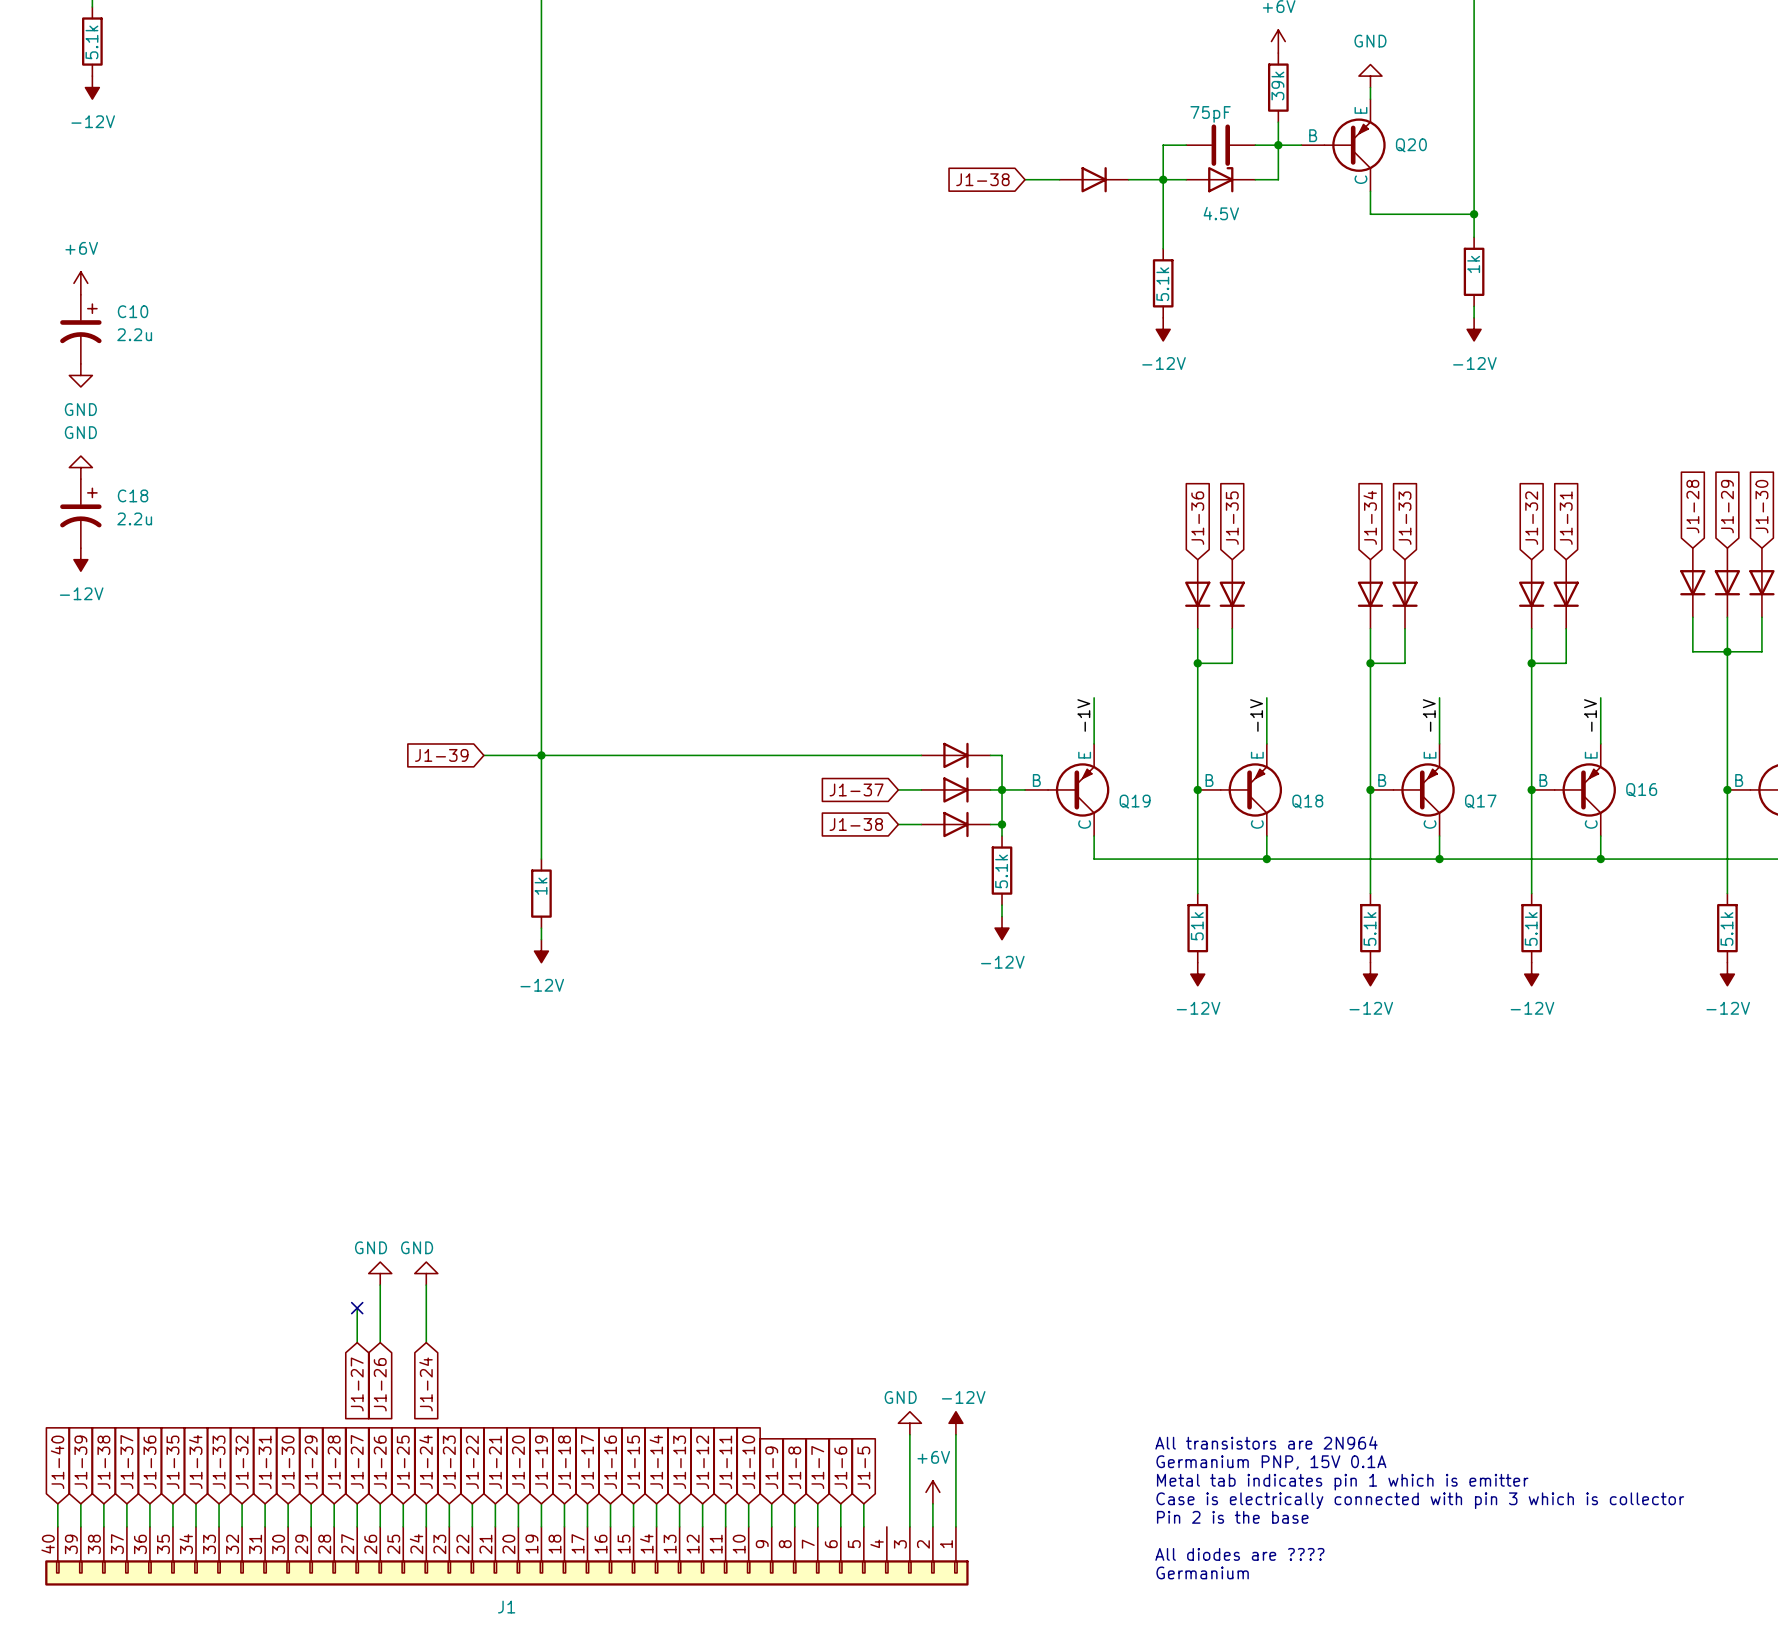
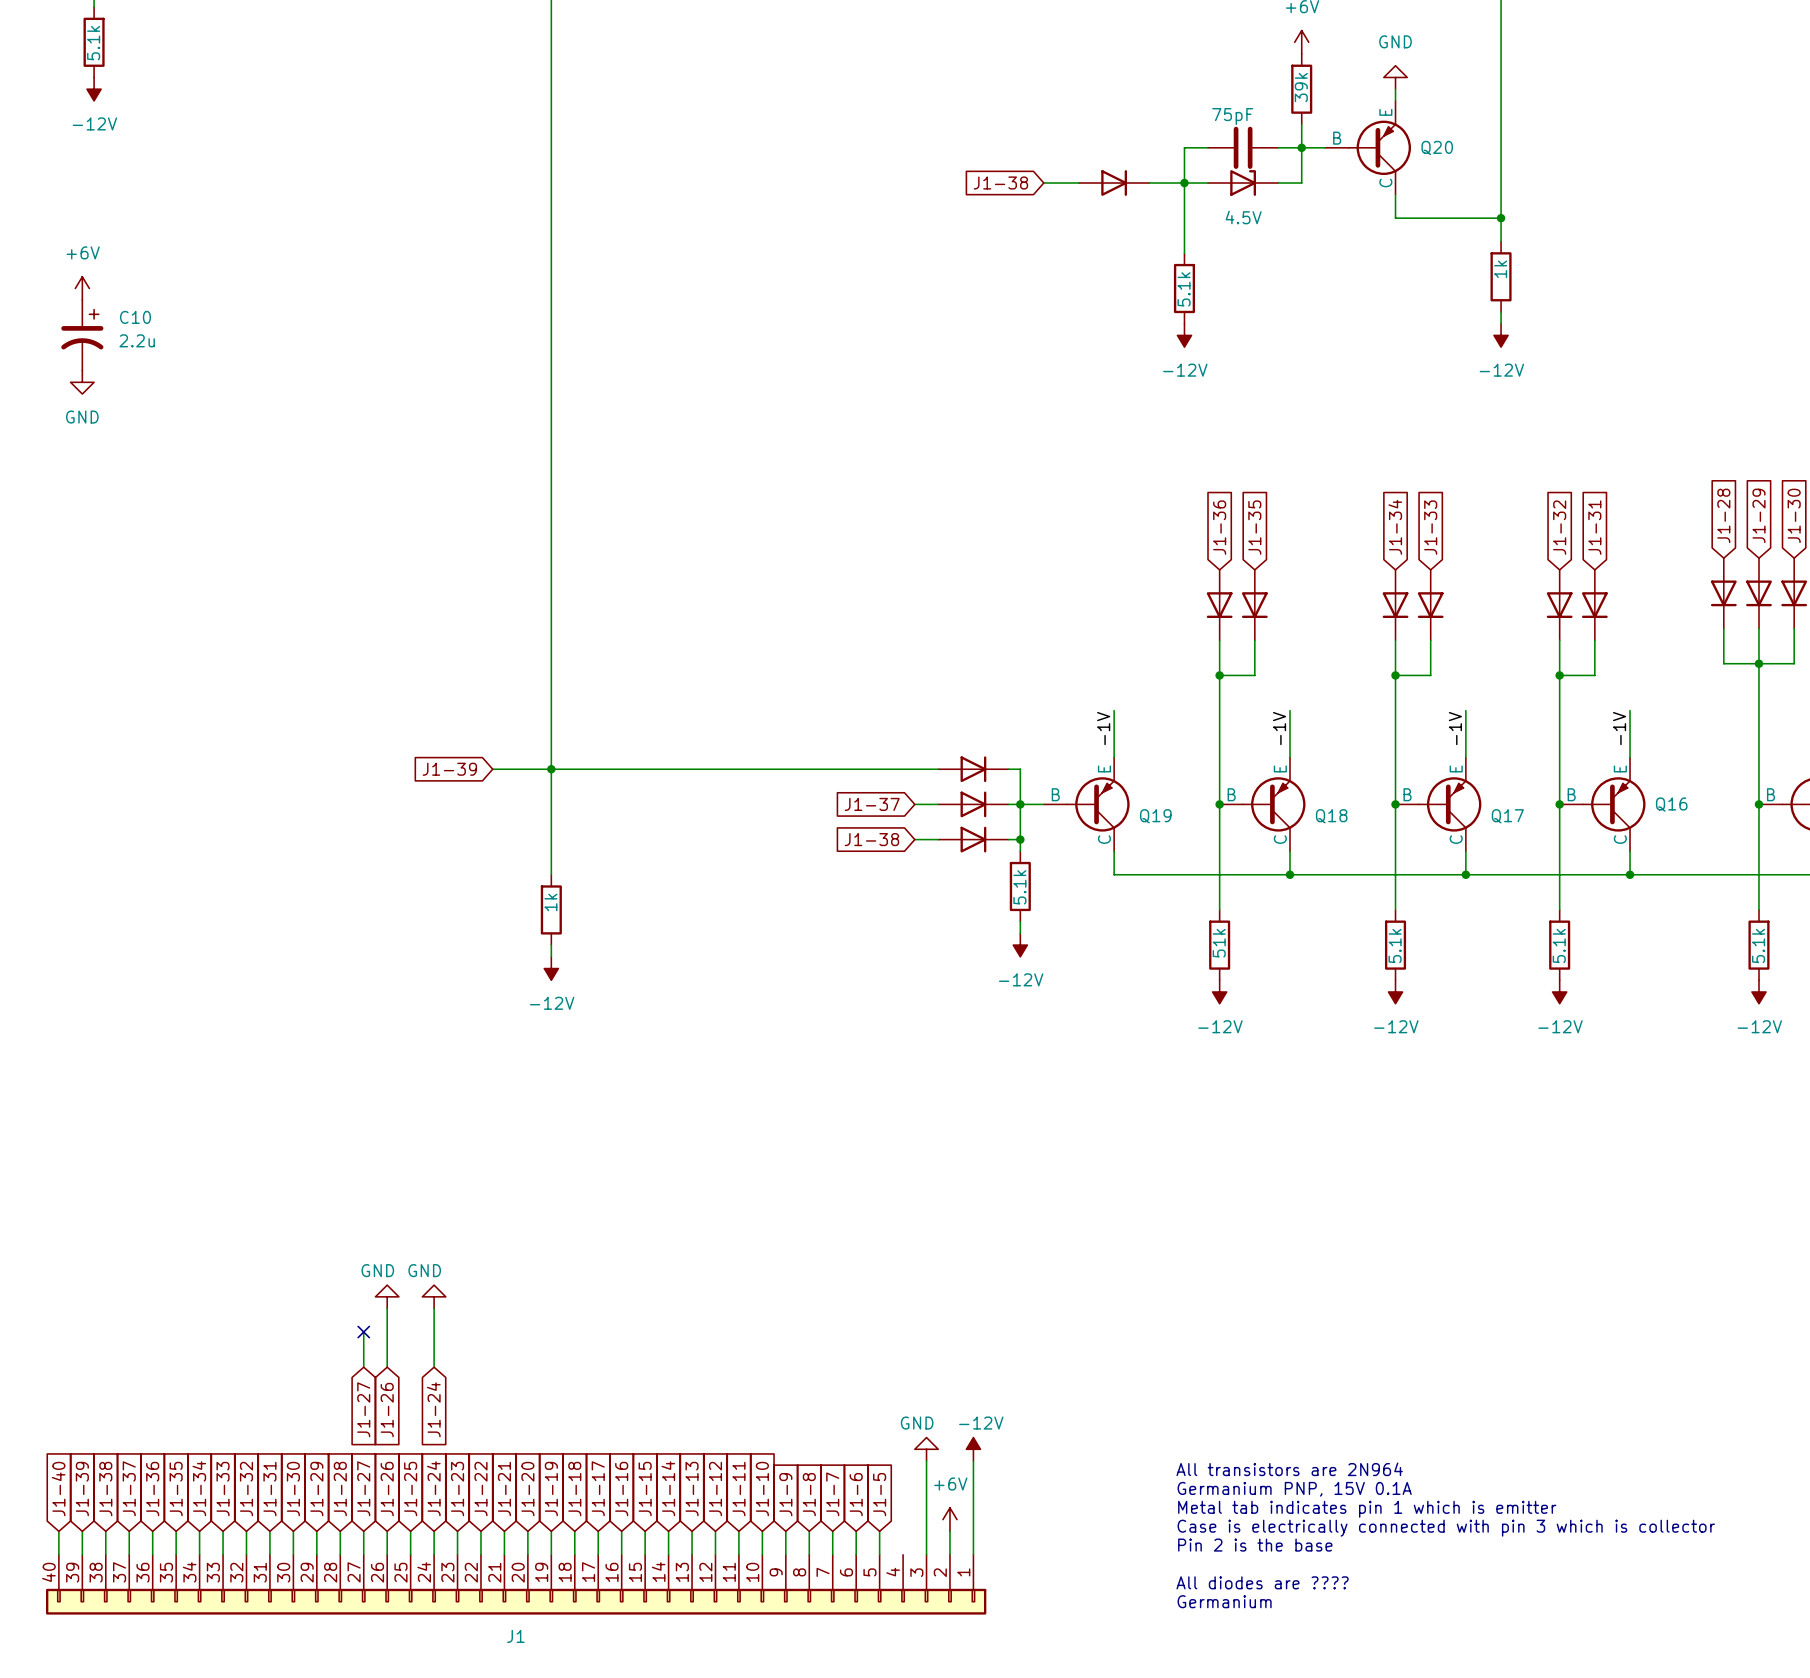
power symbol: GND (80, 467) -> none
C18: 2.2u (80, 513) -> none
power symbol: -12V (80, 559) -> none

